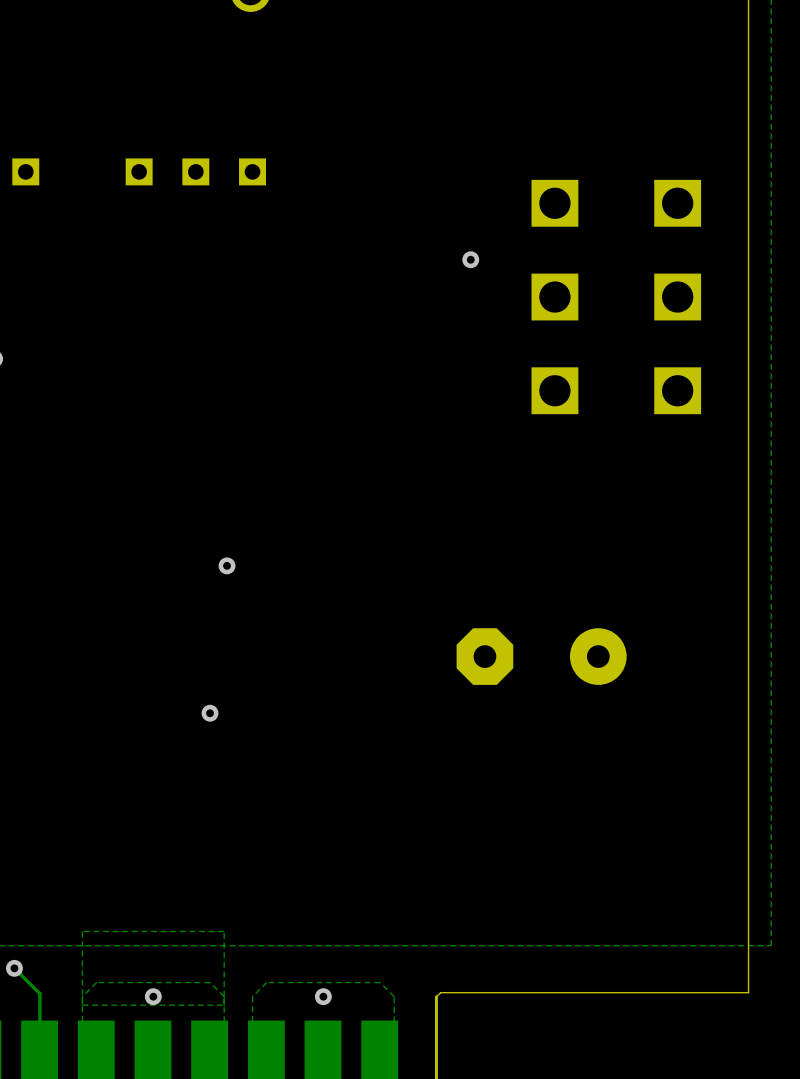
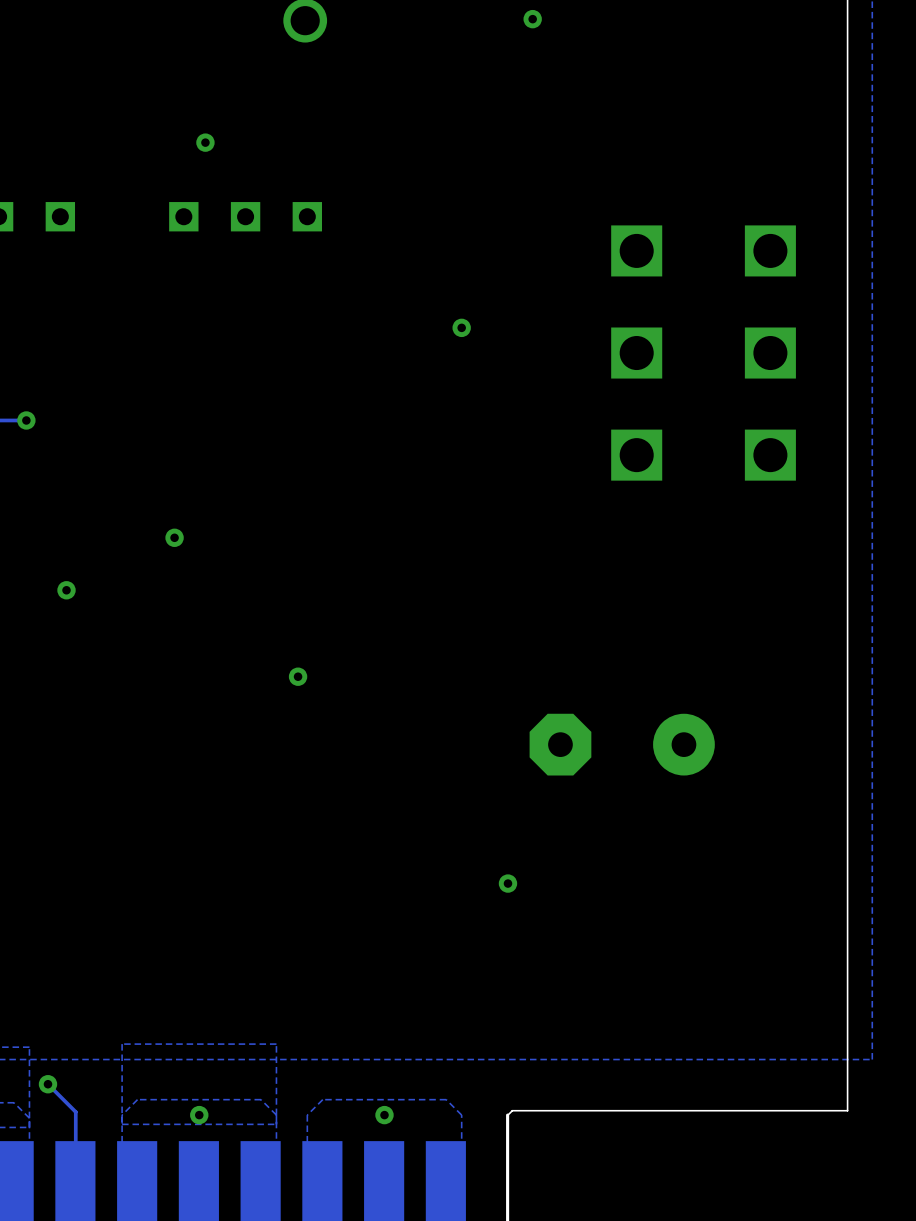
via: none -> (205, 142)
via position: (470, 259) -> (461, 327)
via: none -> (174, 537)
via: none -> (66, 590)
via position: (227, 565) -> (298, 676)
via: (210, 713) -> none
via: none -> (507, 883)

